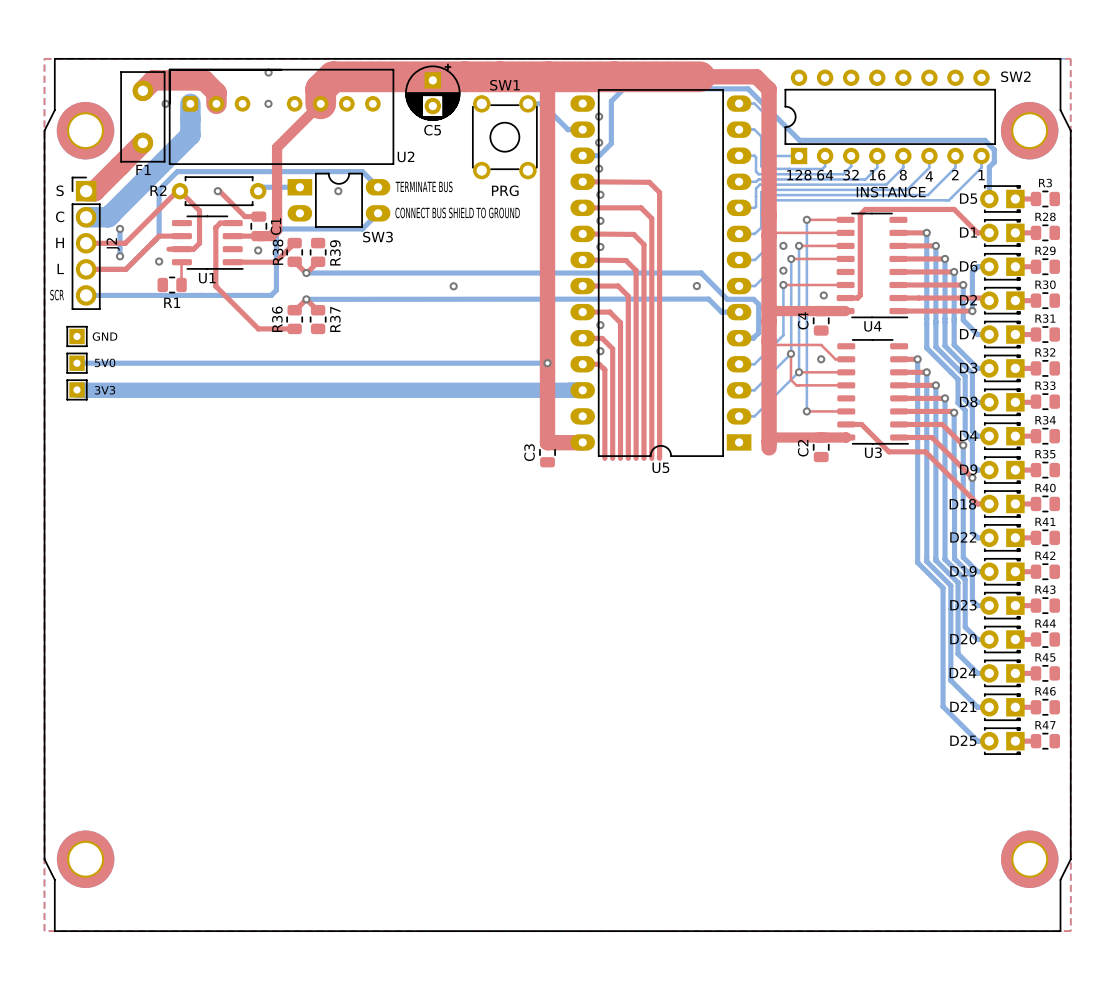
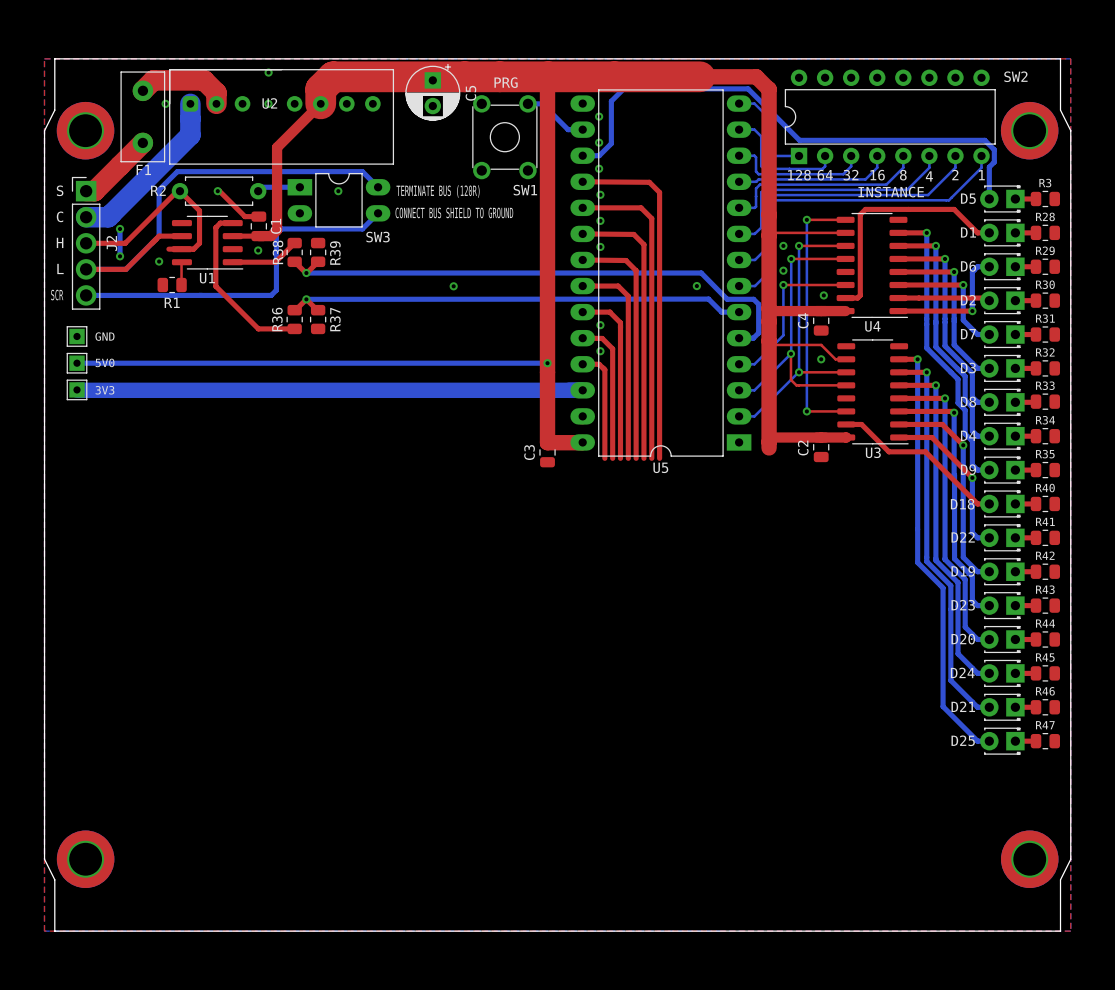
SW1 name position: SW1 (504, 85) -> SW1 (525, 190)
C5 name rotation: 0° (432, 130) -> 90° counterclockwise (470, 93)
C5 name position: C5 (432, 130) -> C5 (470, 93)
U2 name position: U2 (406, 156) -> U2 (269, 103)
text: TERMINATE BUS (424, 186) -> TERMINATE BUS (120R) (438, 191)
SW1 value position: PRG (505, 190) -> PRG (506, 82)

